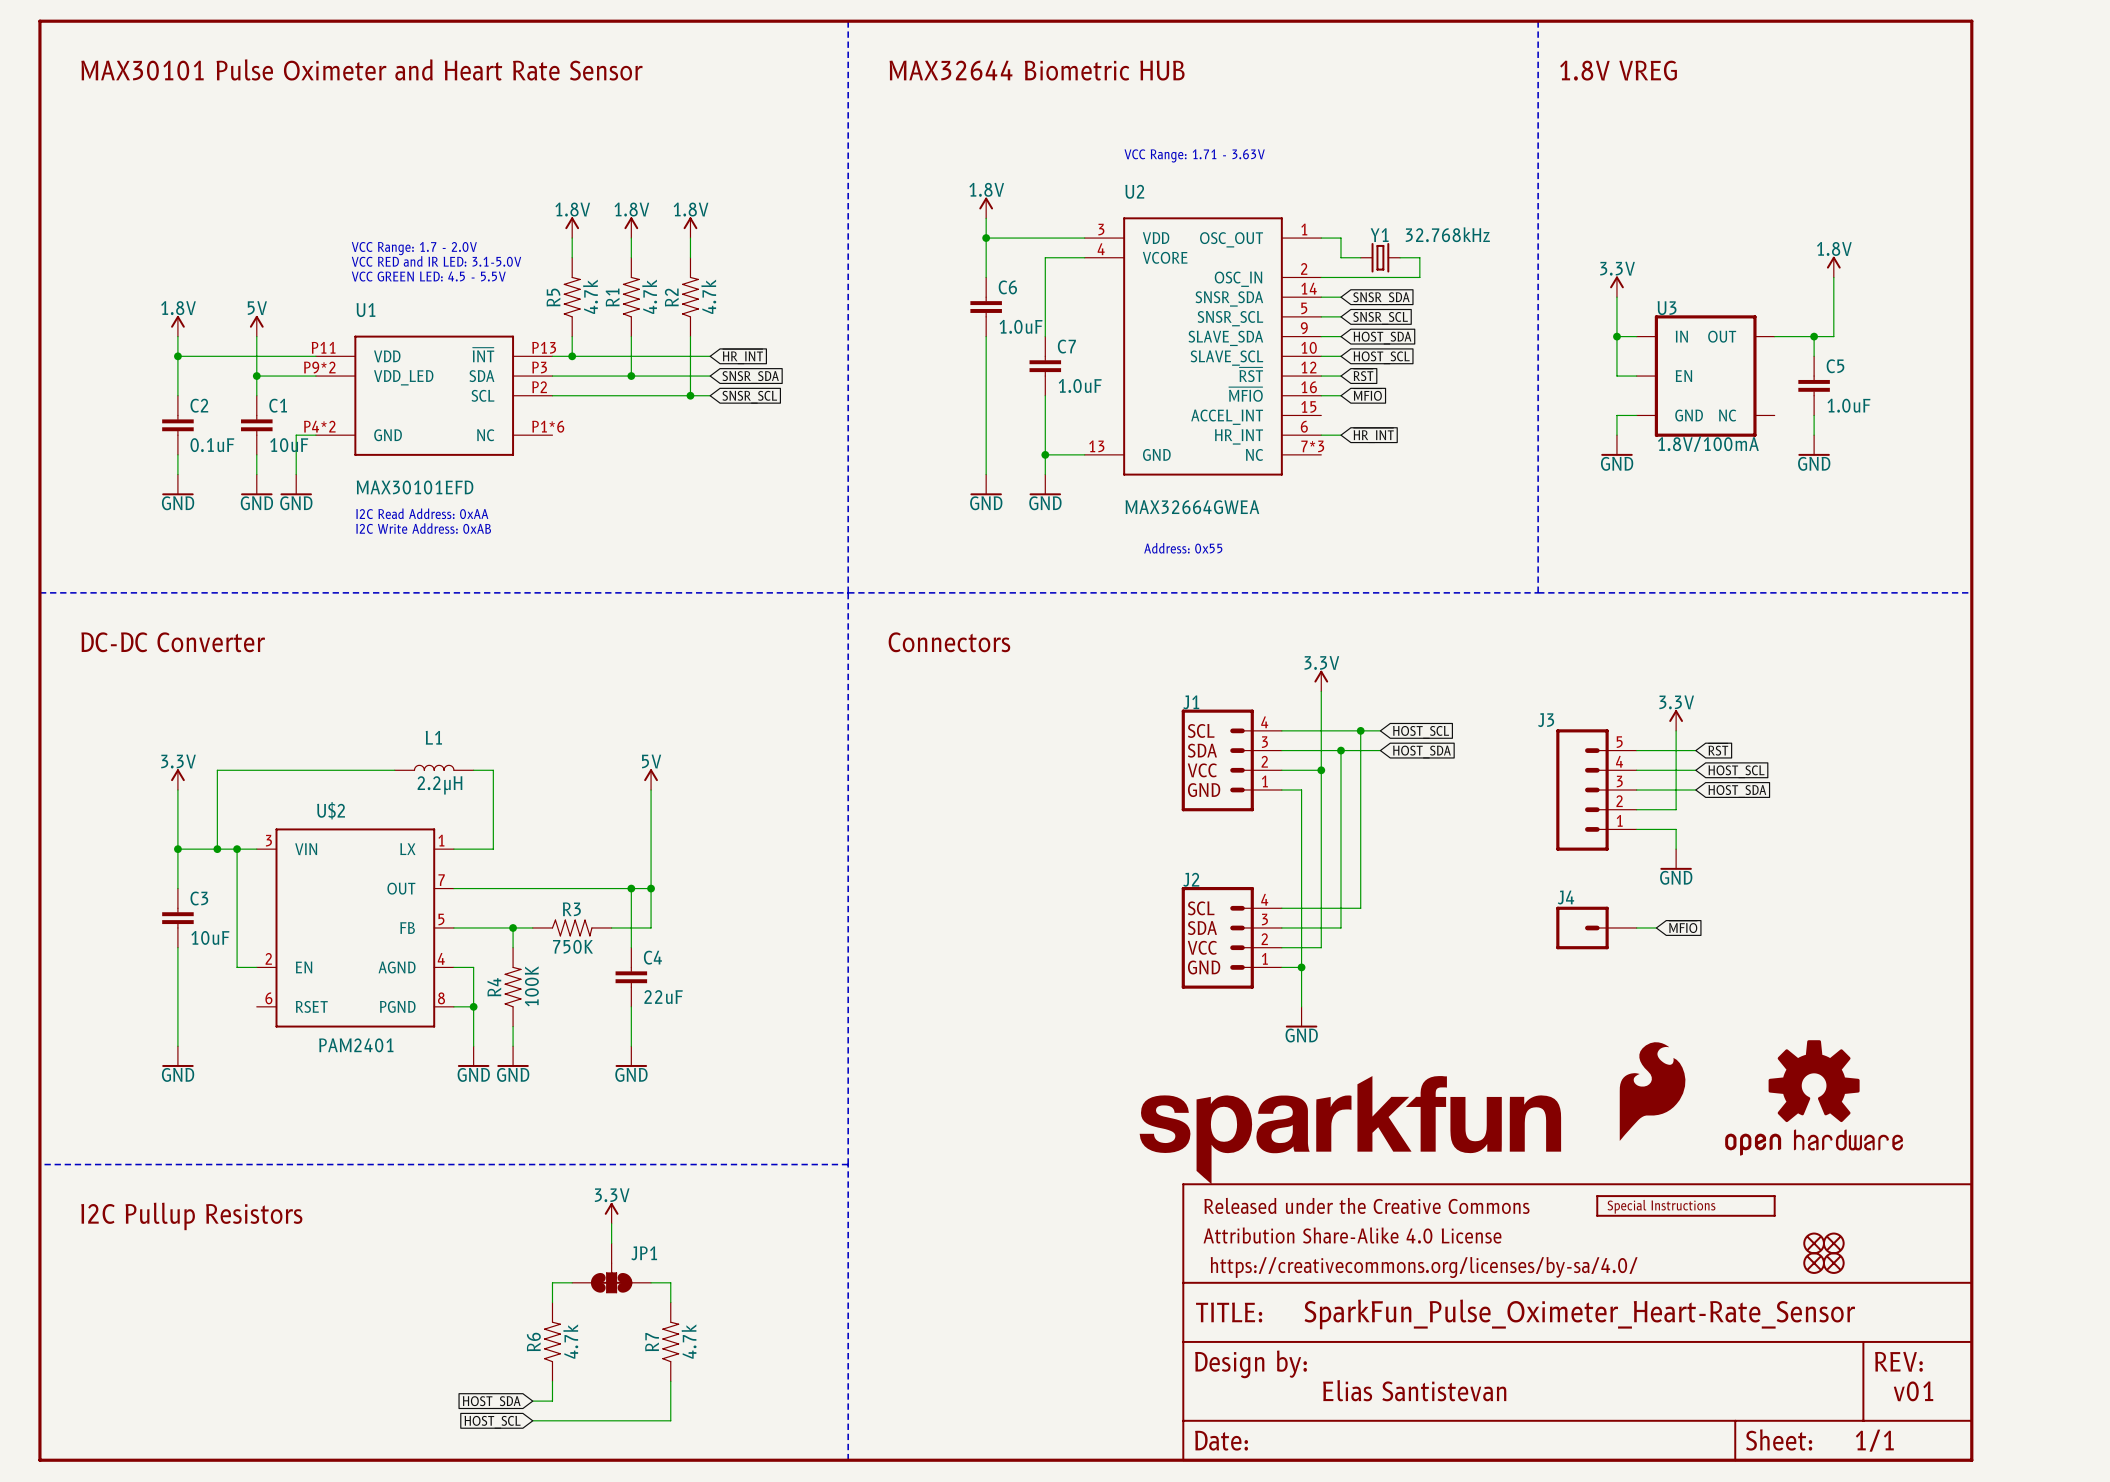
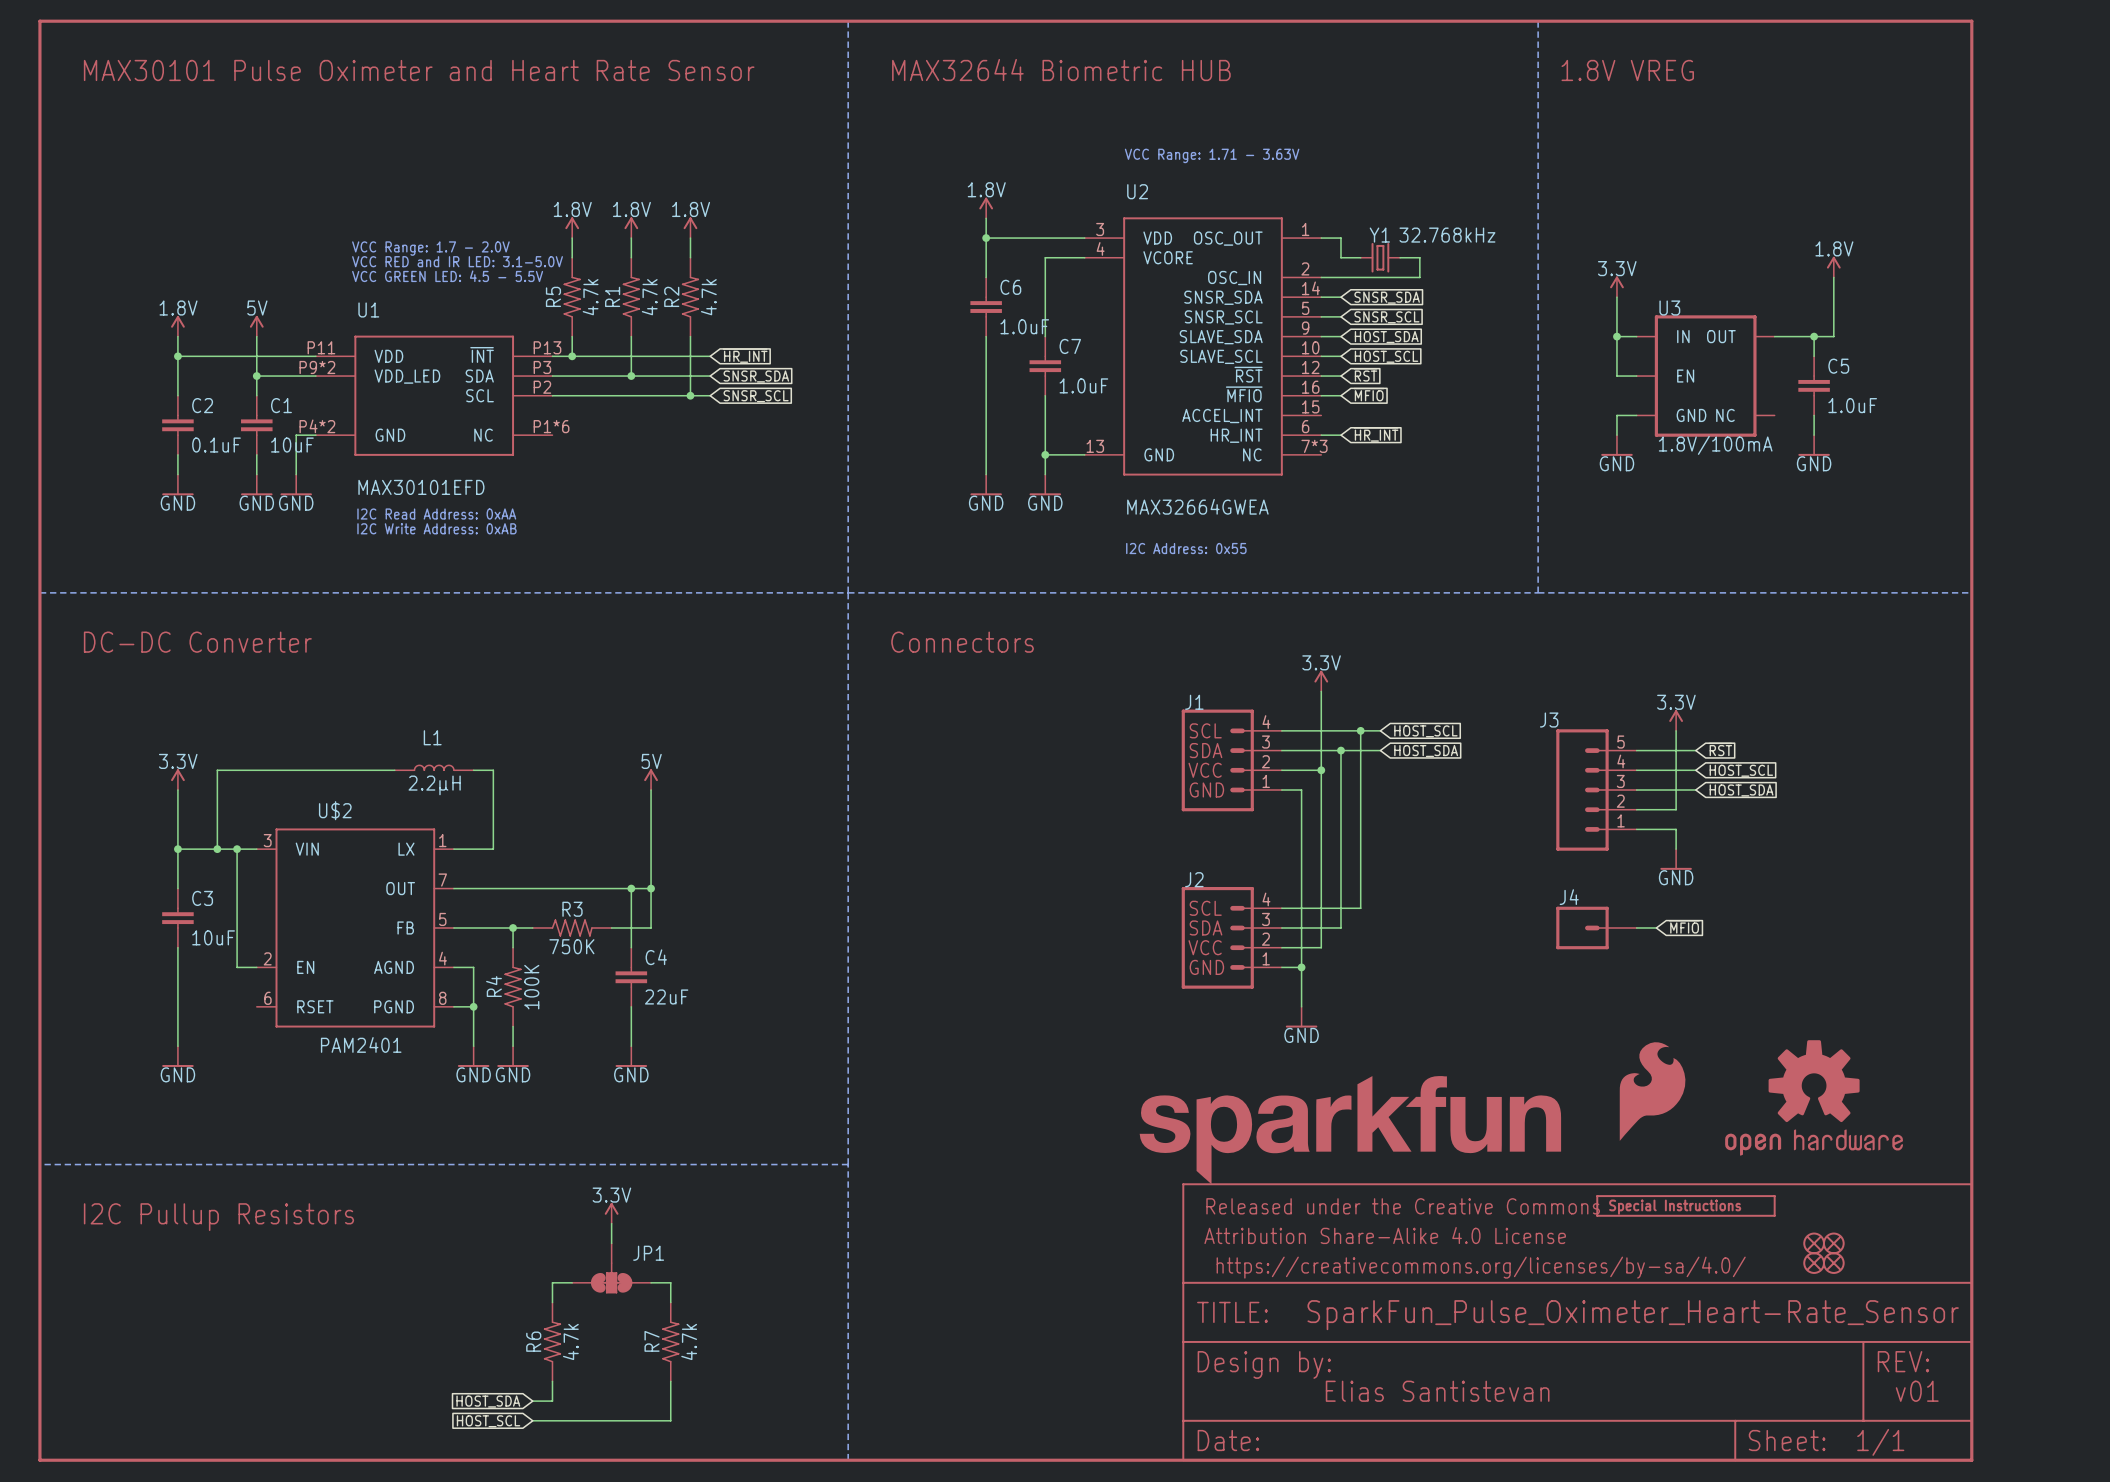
text: Address: 0x55 (1183, 548) -> I2C Address: 0x55 (1186, 548)

